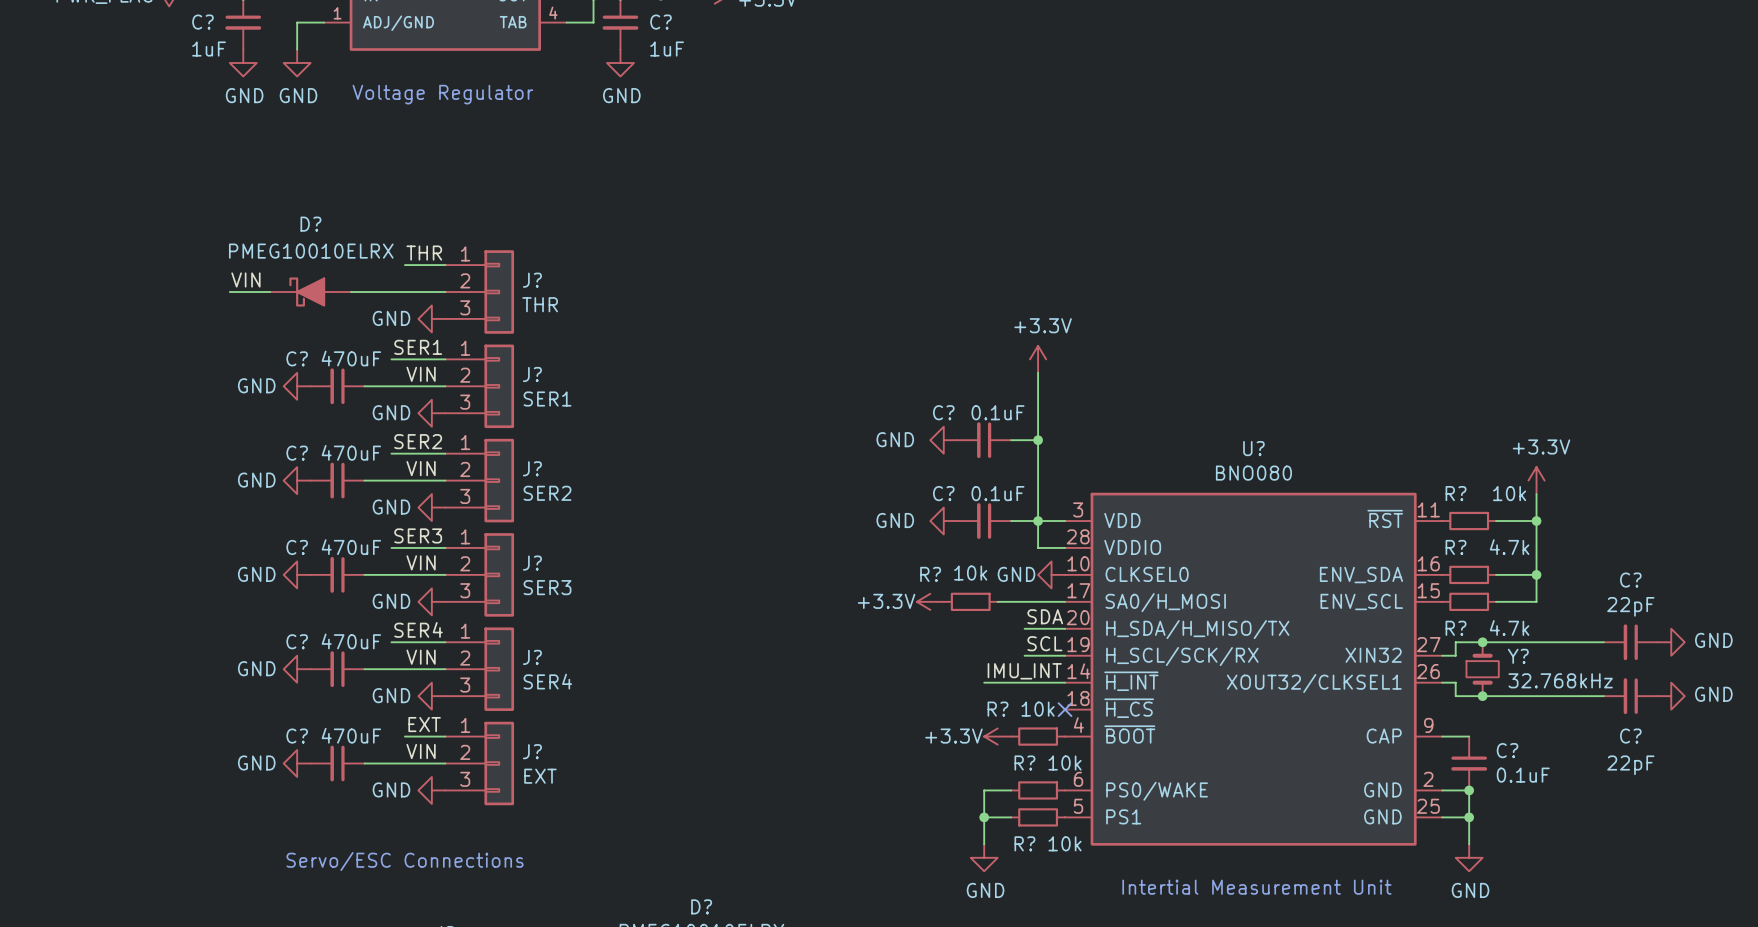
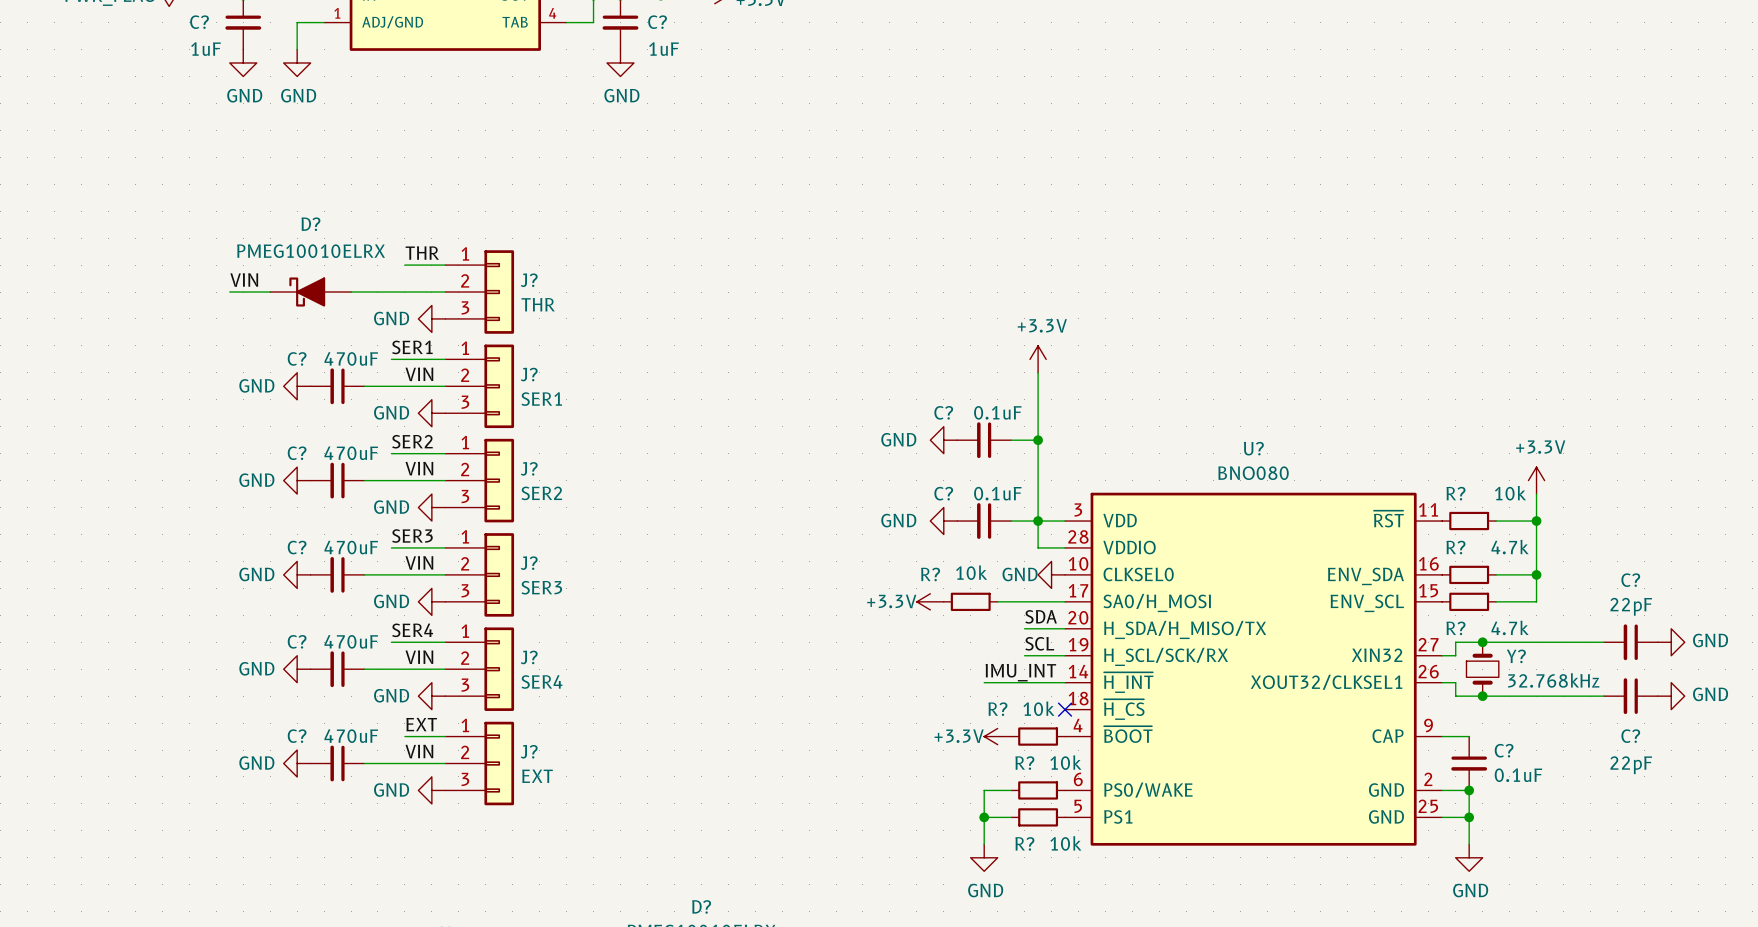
text: Voltage Regulator (442, 94) -> none
text: Servo/ESC Connections (405, 861) -> none
text: Intertial Measurement Unit (1256, 887) -> none

